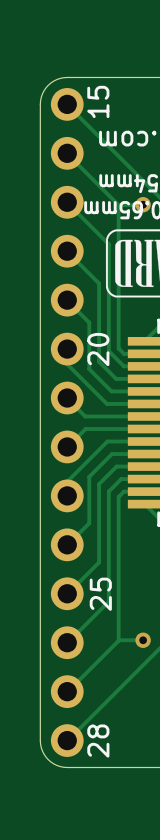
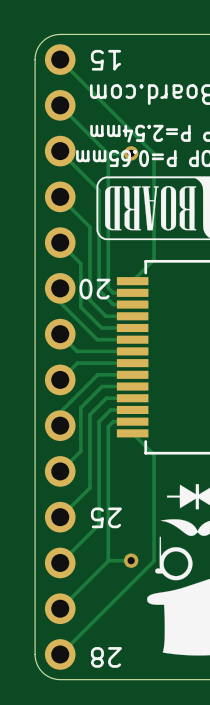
text rotation: 0° (98, 101) -> 90° counterclockwise (105, 60)
text rotation: 0° (98, 349) -> 90° counterclockwise (94, 289)
text rotation: 0° (100, 594) -> 90° counterclockwise (106, 517)
text rotation: 0° (98, 741) -> 90° counterclockwise (106, 657)

